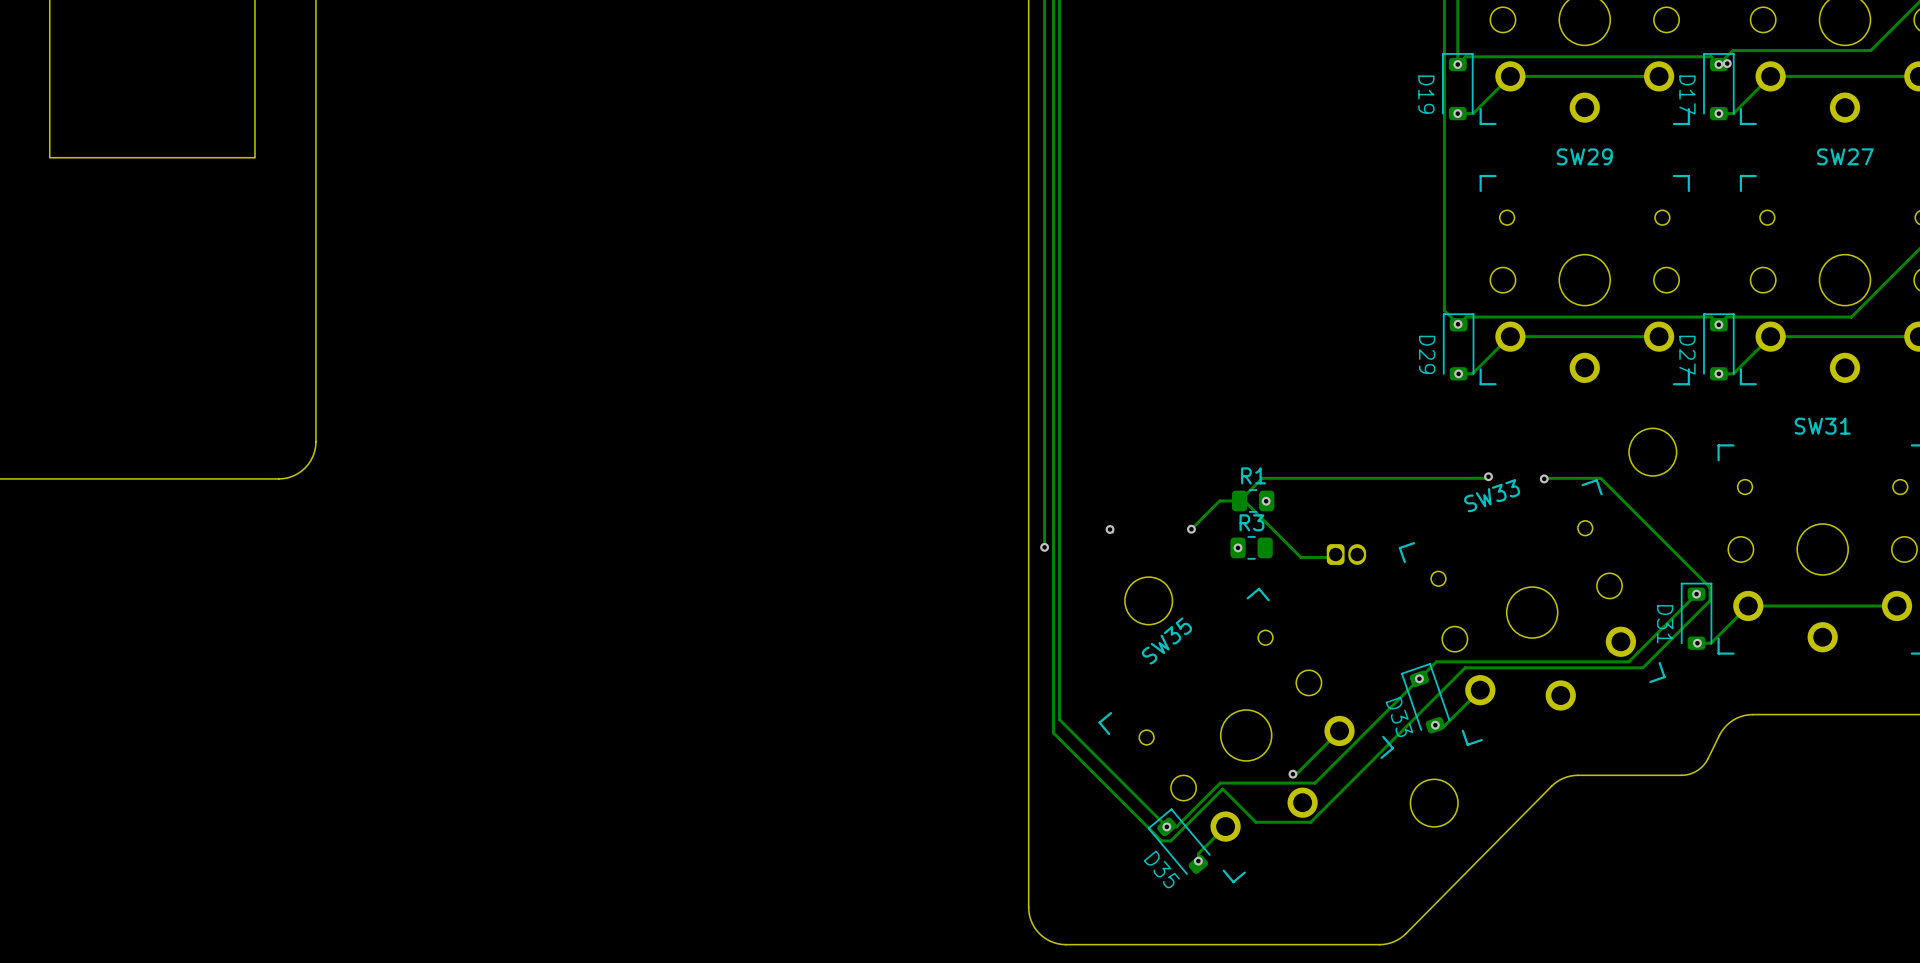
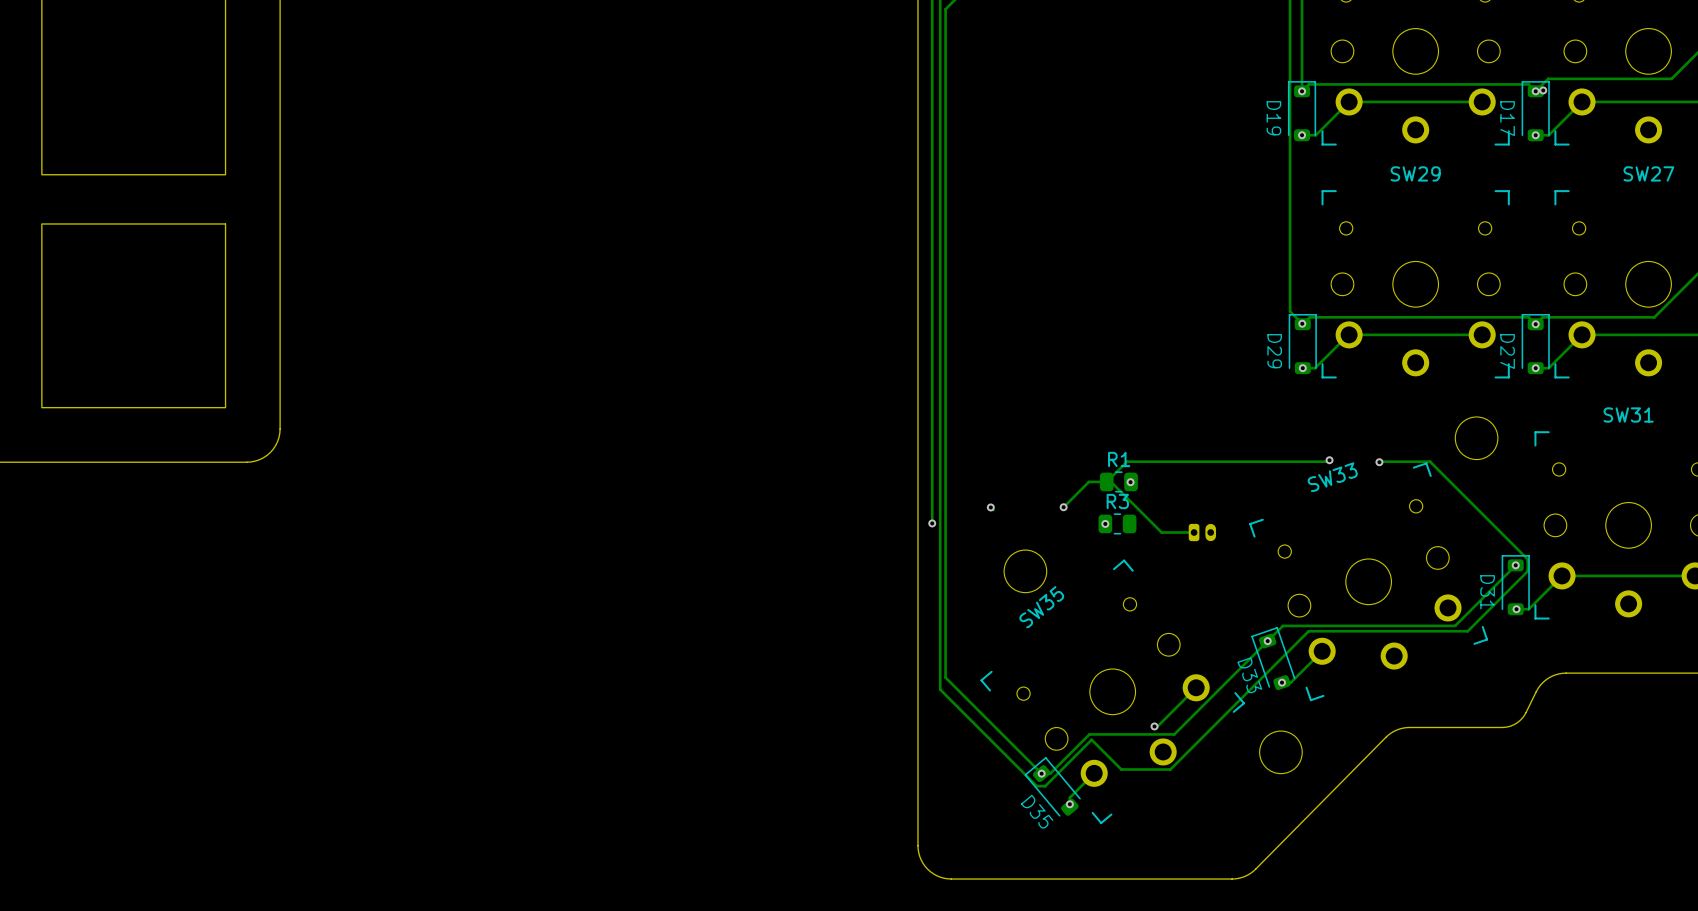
drawing: none -> [41, 223, 227, 409]
part footprint: [1326, 544, 1367, 565] -> [1188, 523, 1217, 542]

